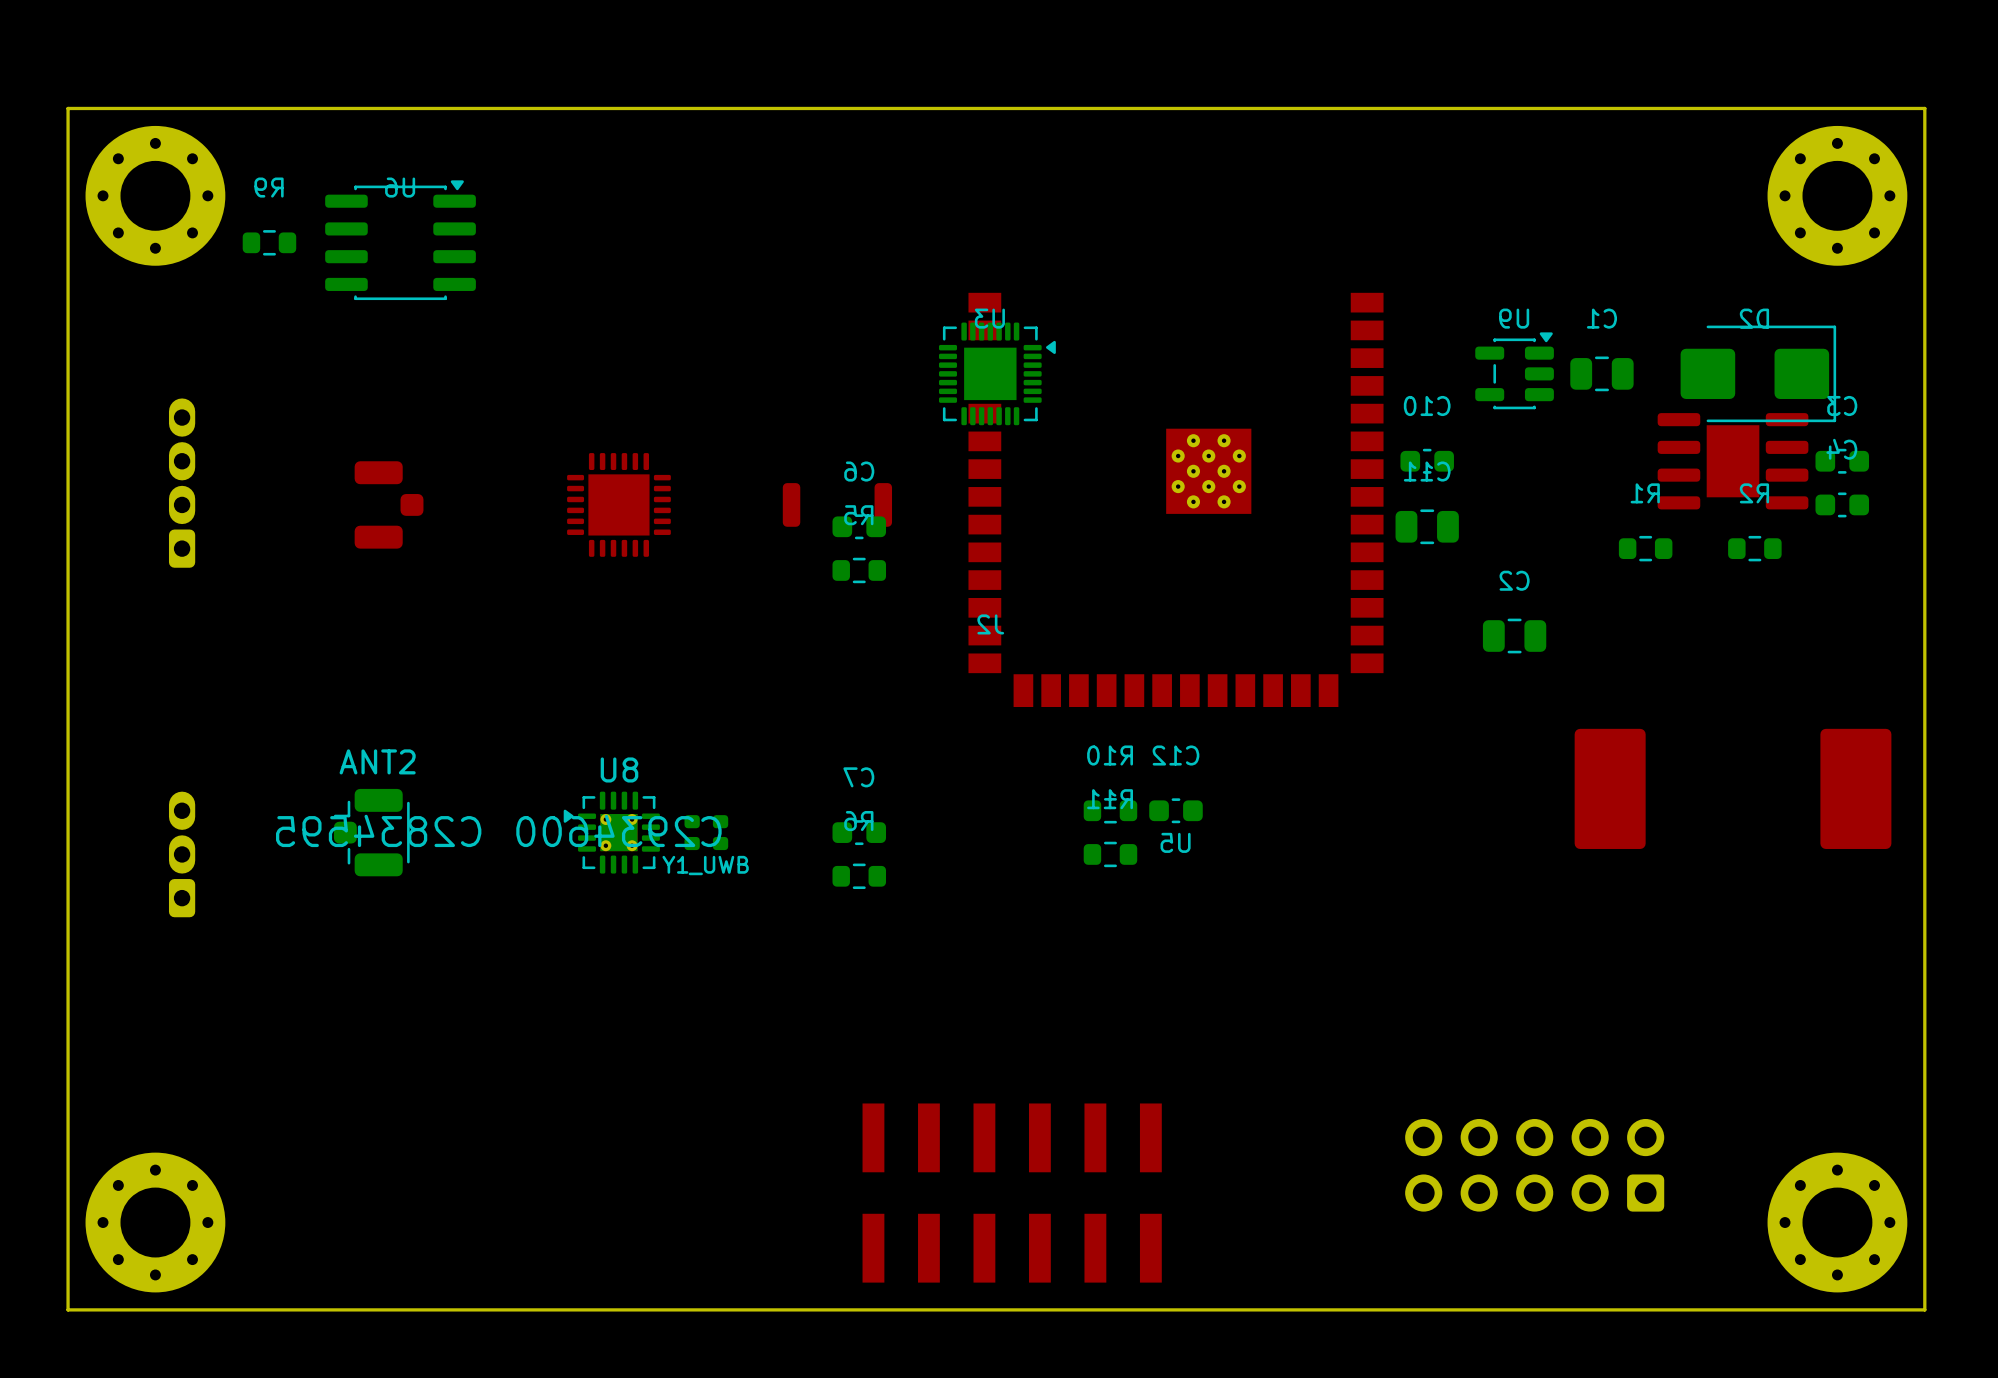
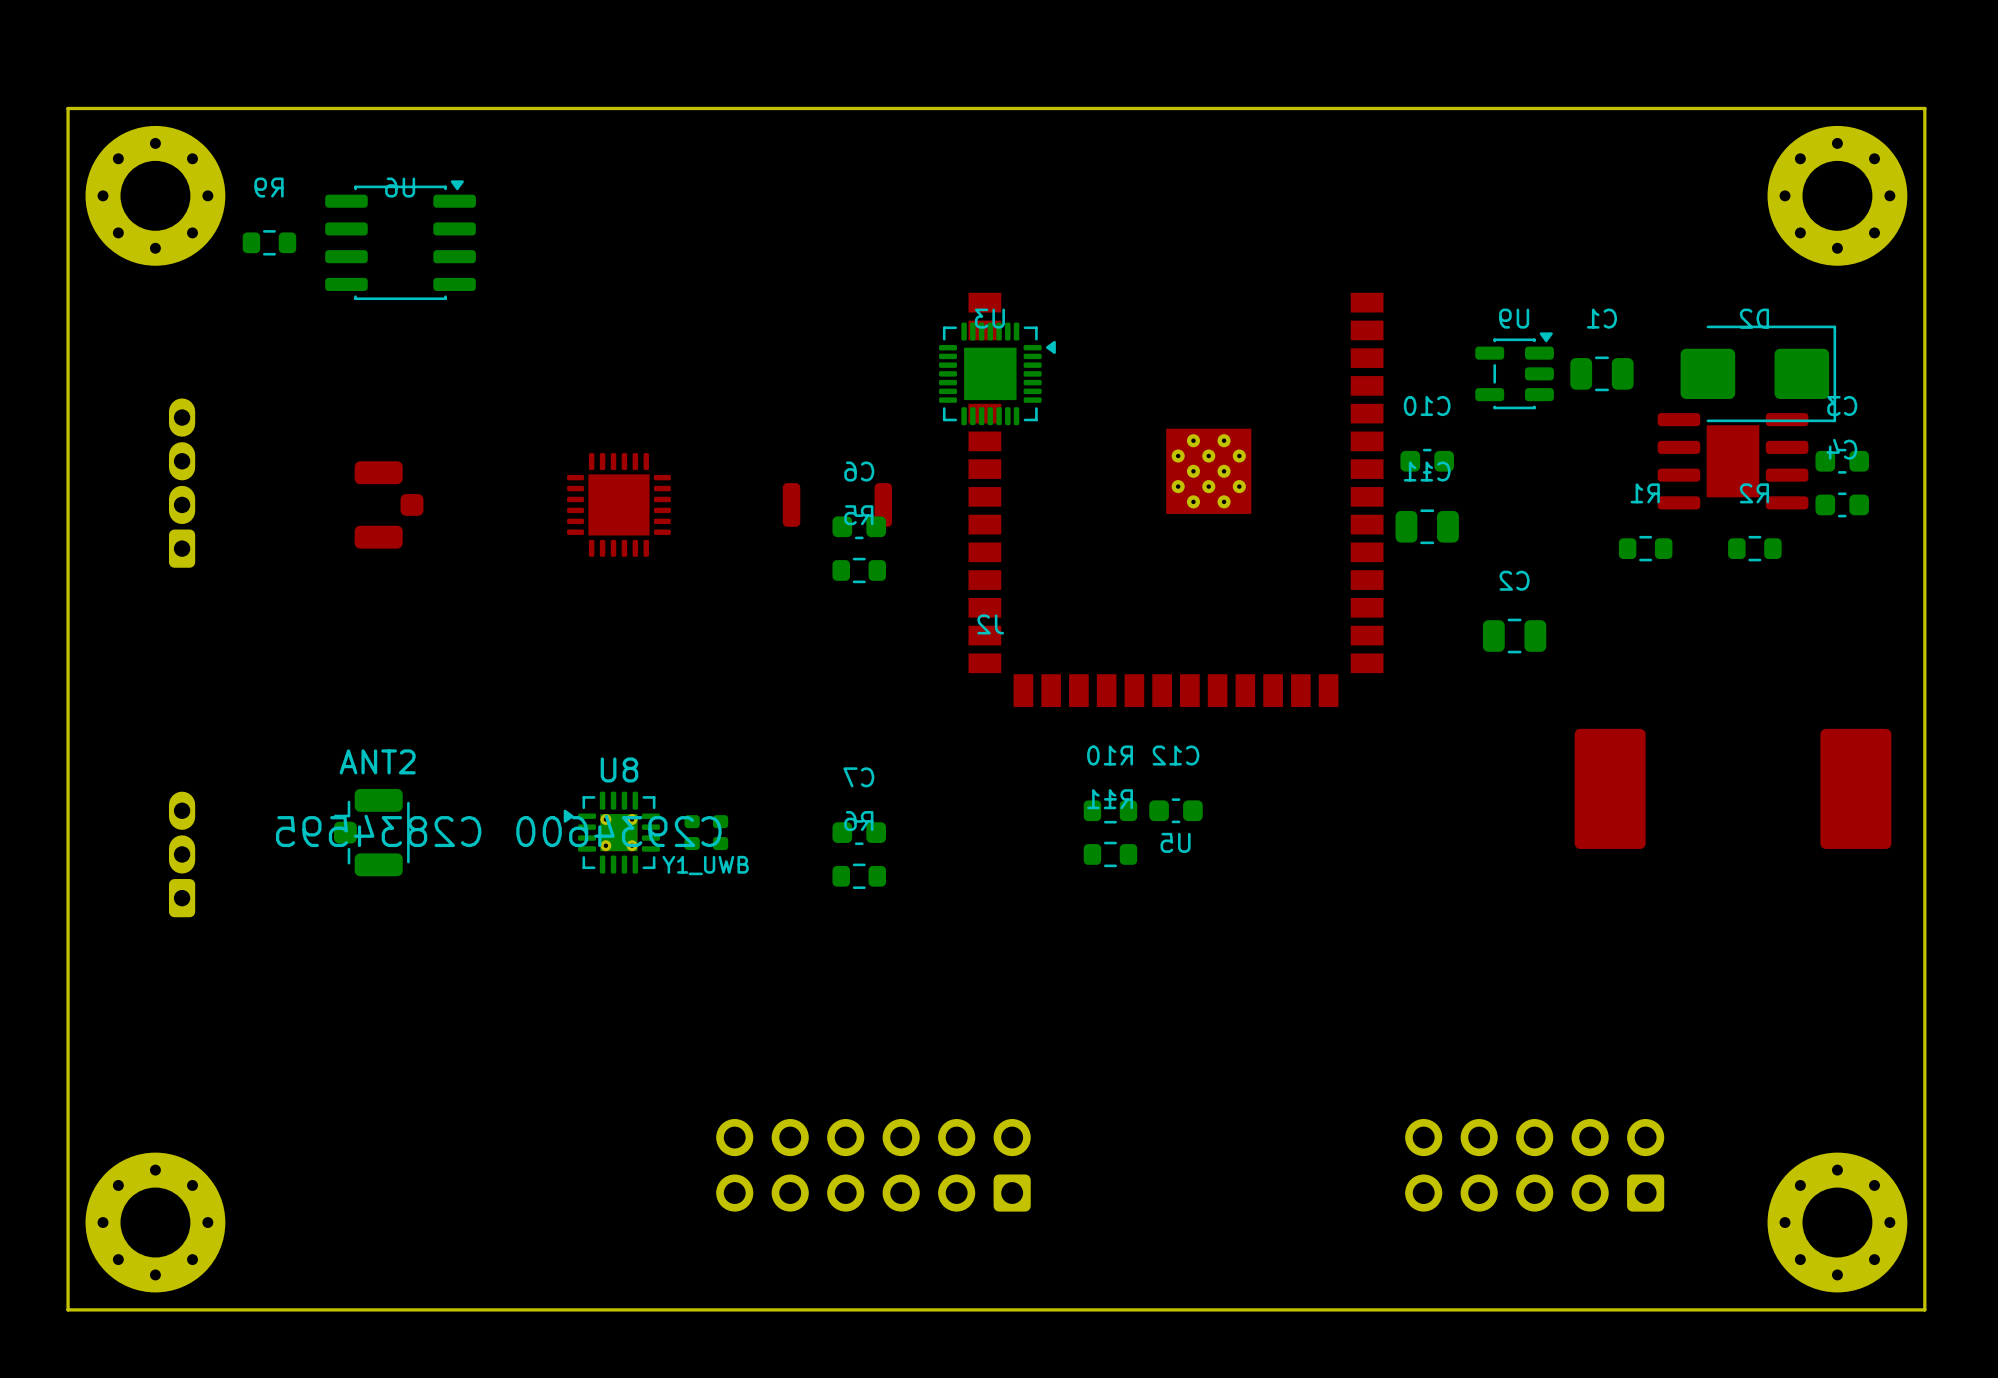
part: none -> (873, 1165)
part: (1012, 1193) -> none

